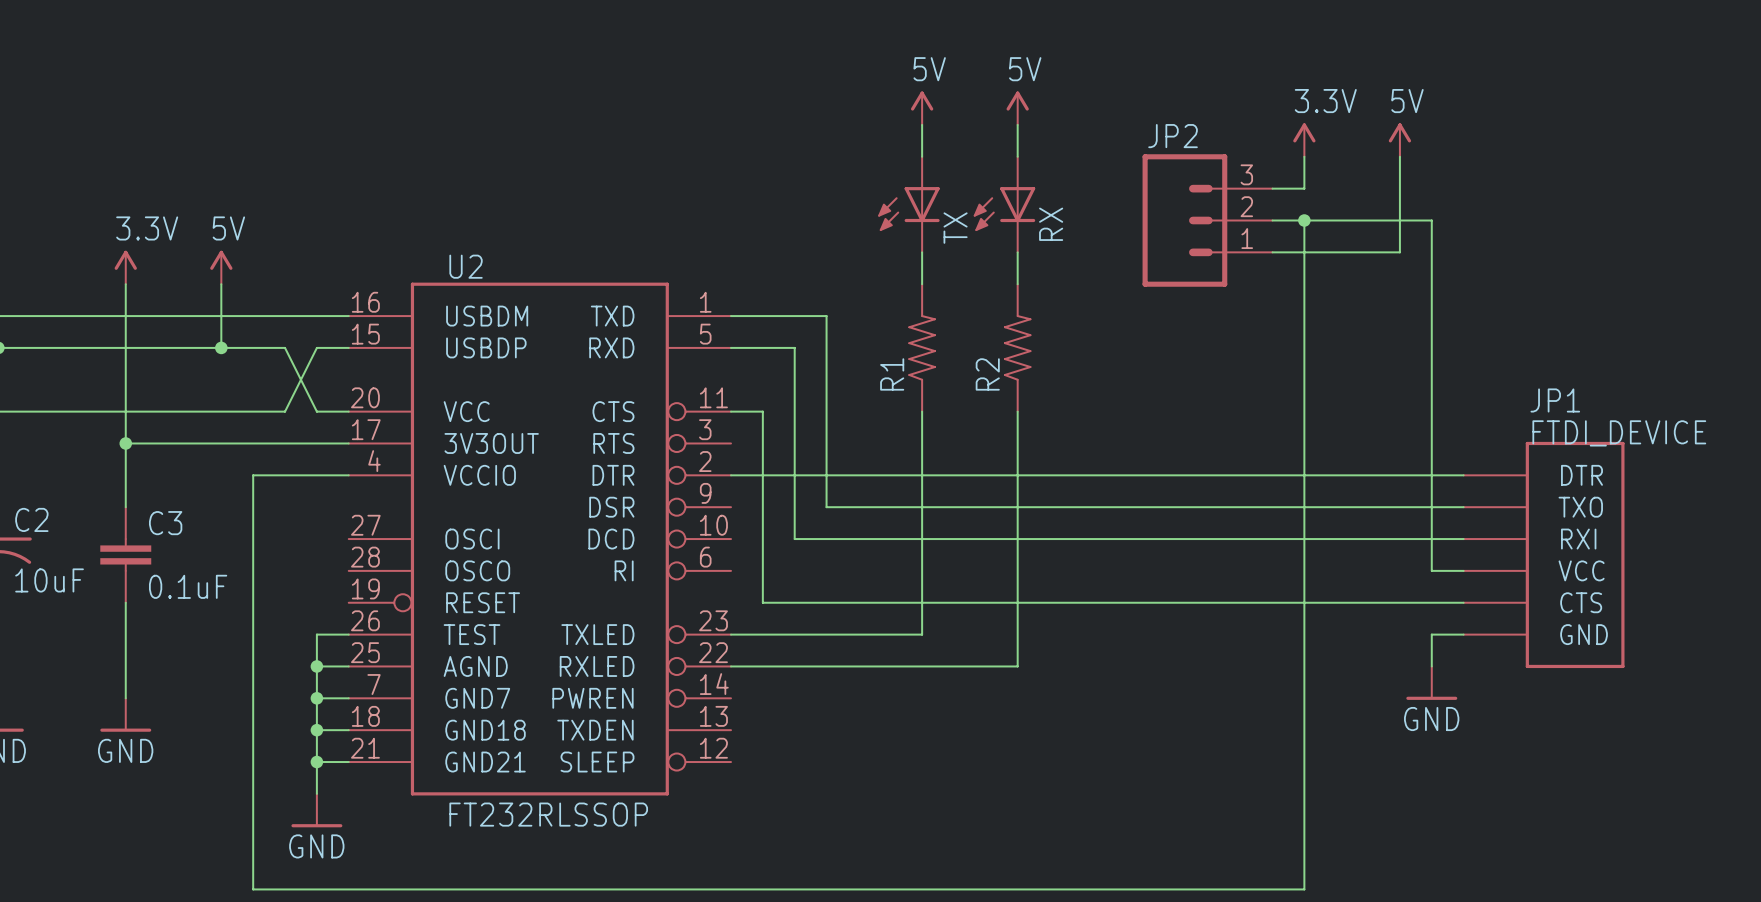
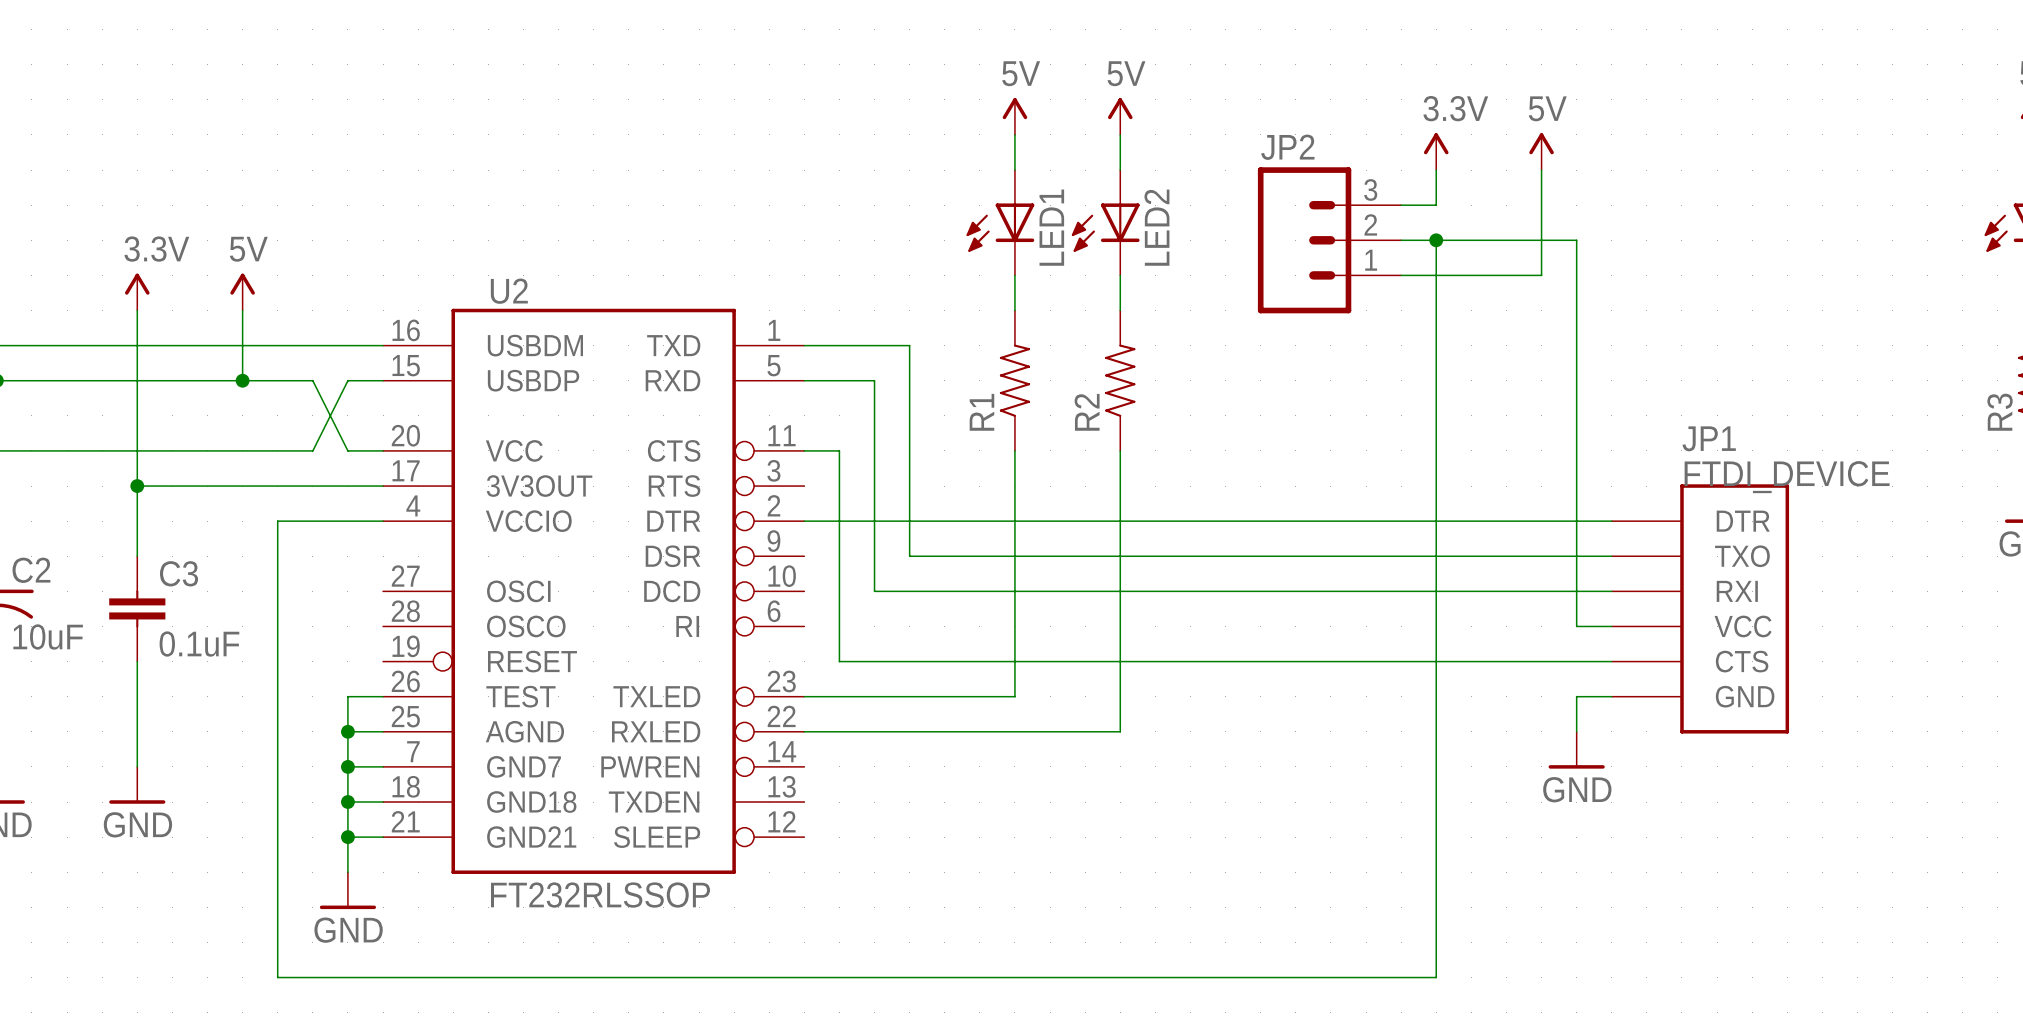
RX name: RX (1051, 224) -> LED2 (1156, 227)
TX name: TX (955, 228) -> LED1 (1051, 227)

